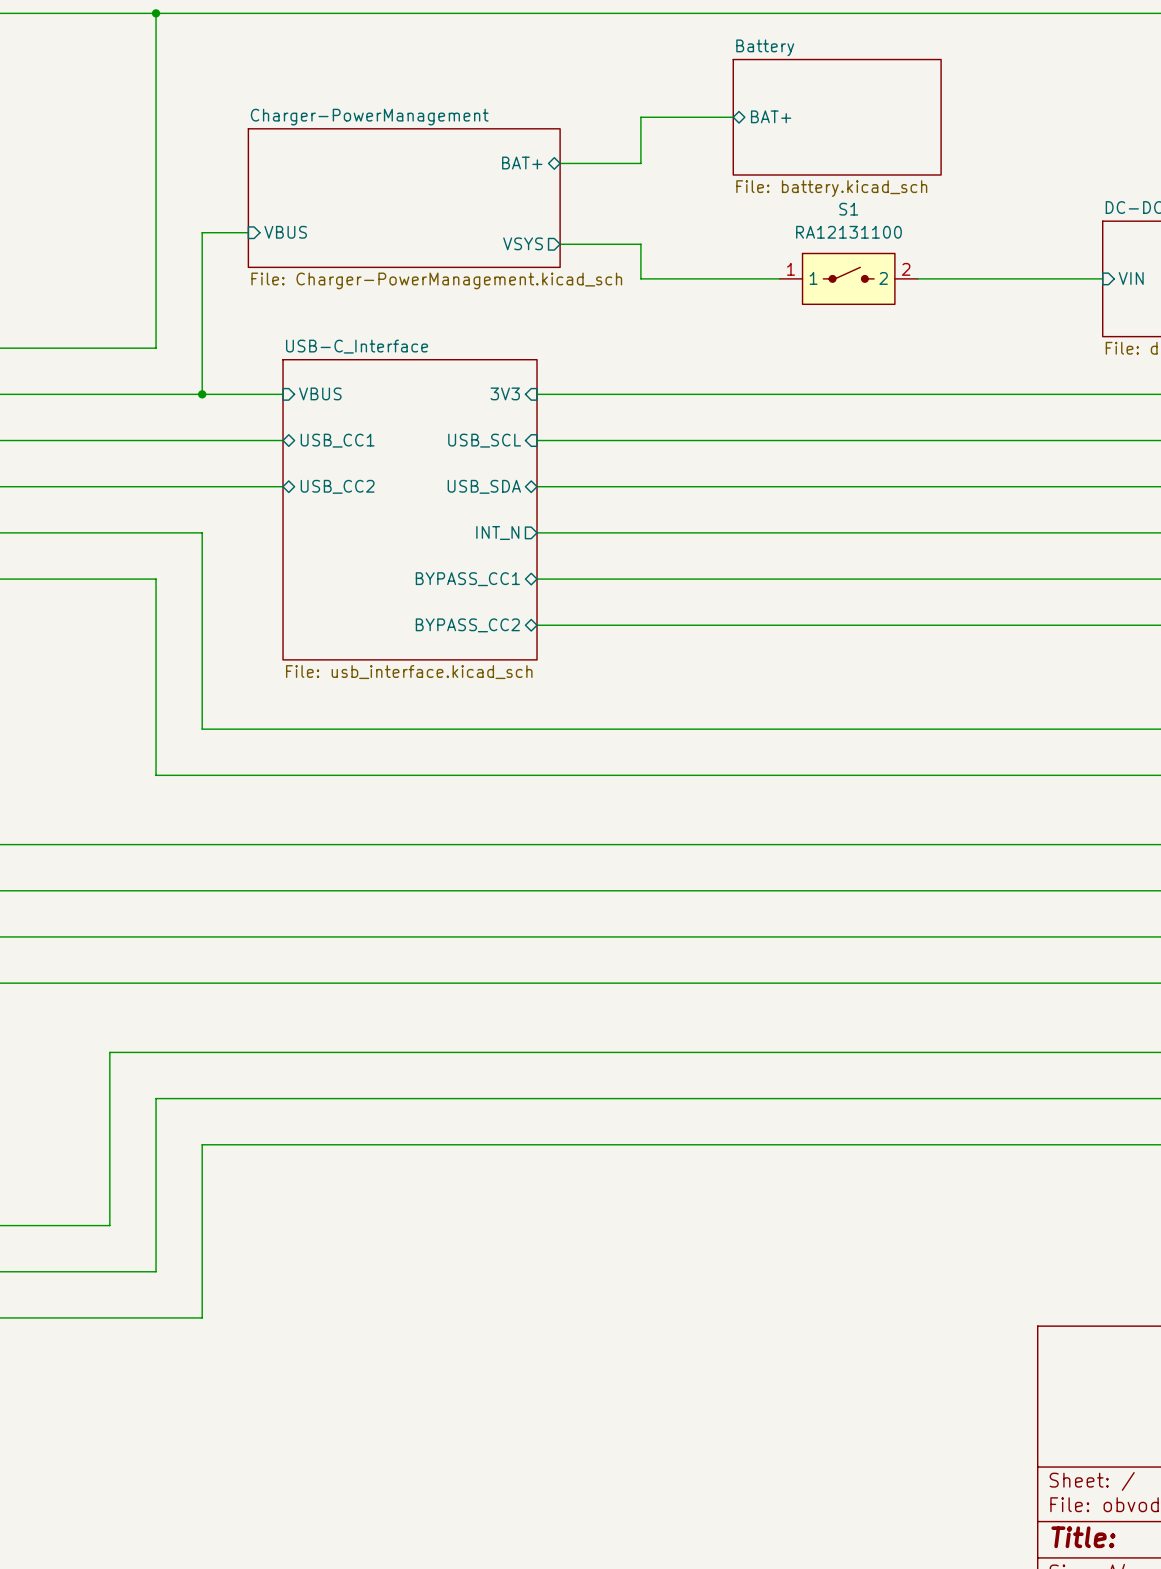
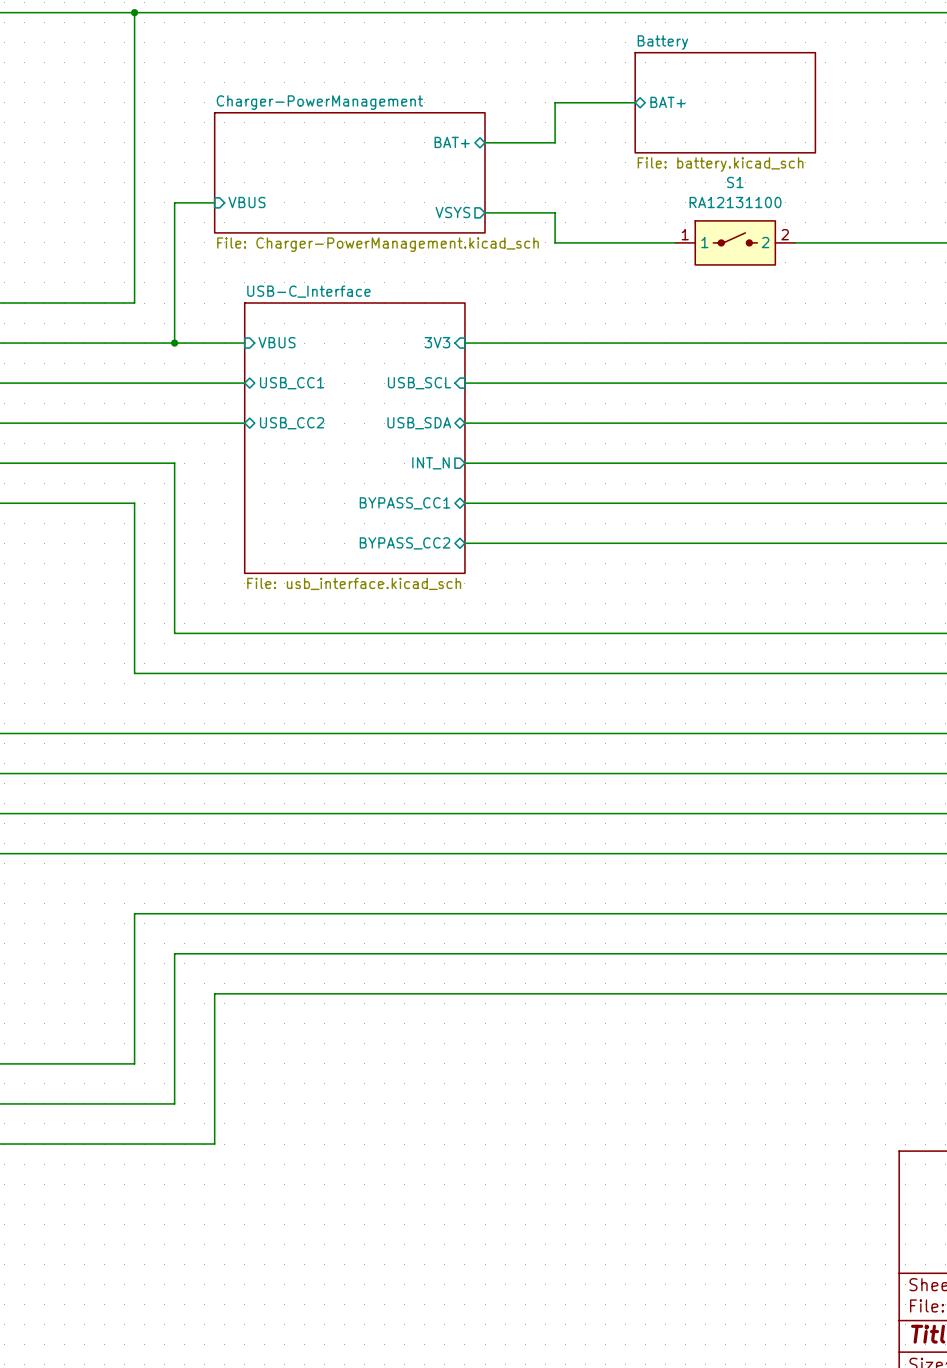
sheet USB-C_Interface shape: [282, 359, 538, 661] -> [244, 302, 466, 574]
wire: (156, 1052) (109, 1052) (109, 1225) -> none
wire: (156, 1098) (202, 1098) -> (134, 953) (134, 913)
wire: (202, 1144) (248, 1144) -> (174, 993) (174, 953)
wire: none -> (214, 993) (214, 1144) (174, 1144)
wire: (156, 1225) (156, 1271) -> (134, 1063) (94, 1063)
wire: (202, 1271) (202, 1317) -> (174, 1103) (134, 1103)

